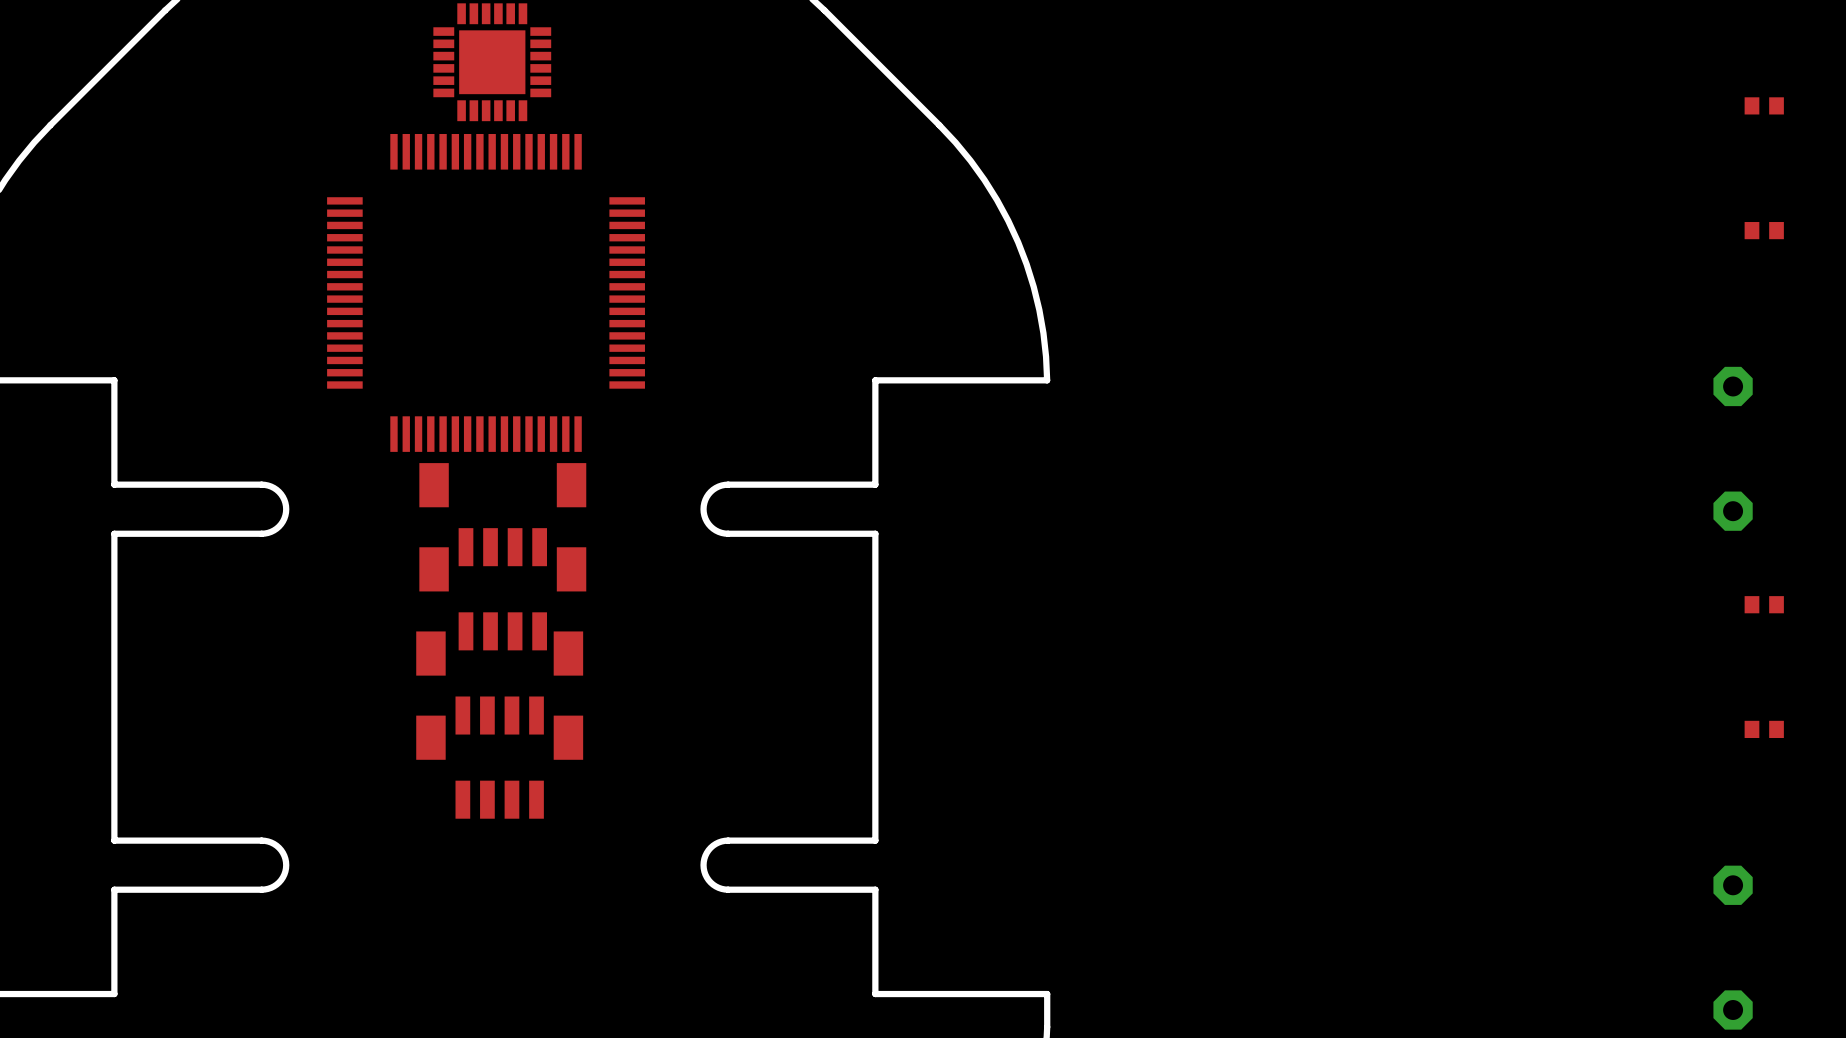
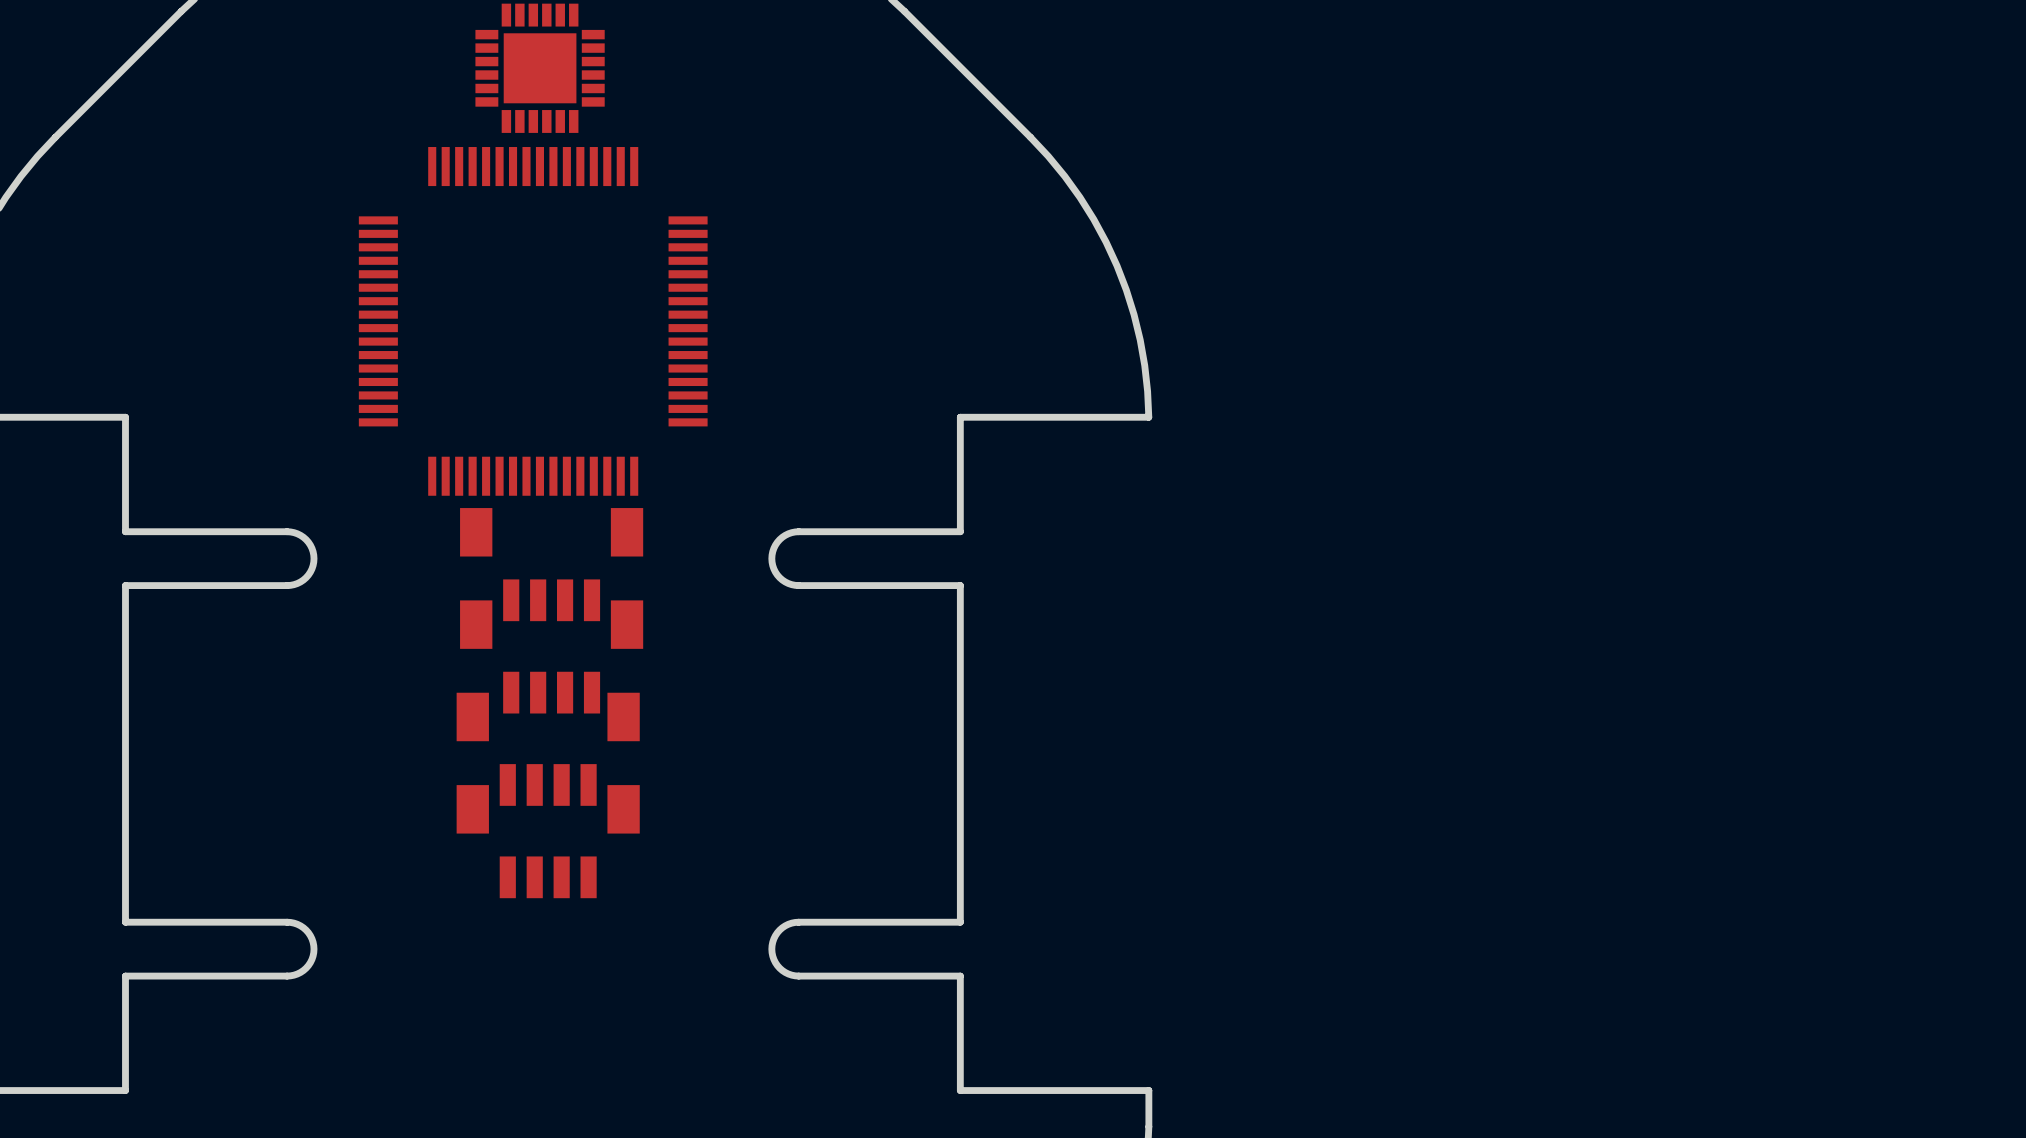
part: (1764, 105) -> none
part: (1764, 230) -> none
part: (1733, 386) -> none
part: (1733, 511) -> none
part: (1764, 604) -> none
part: (1764, 729) -> none
part: (1733, 885) -> none
part: (1733, 1009) -> none

